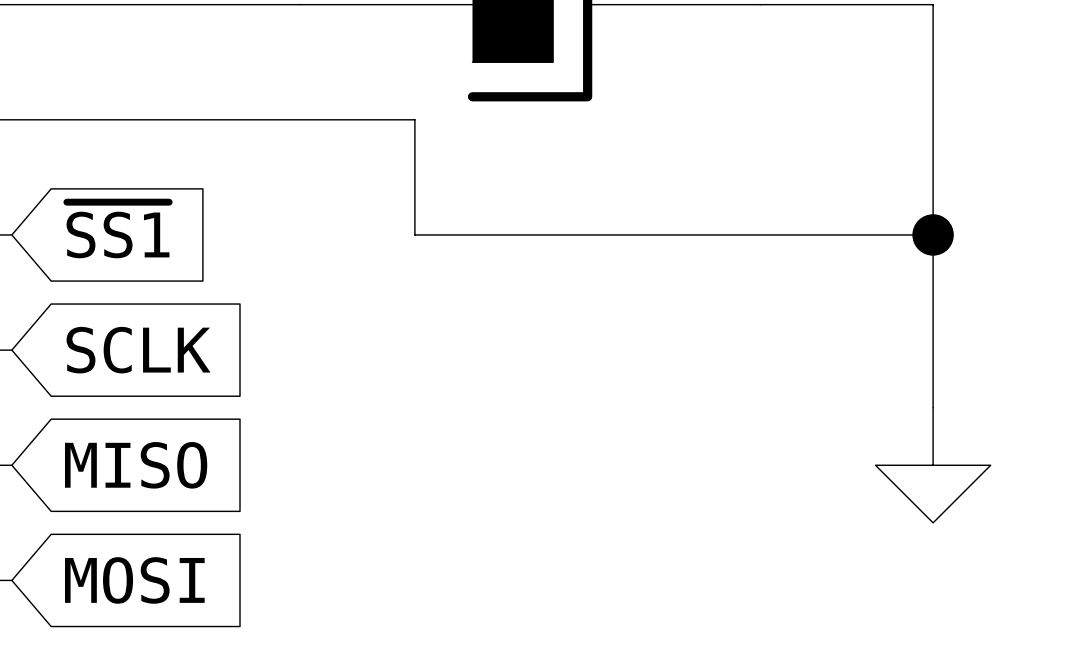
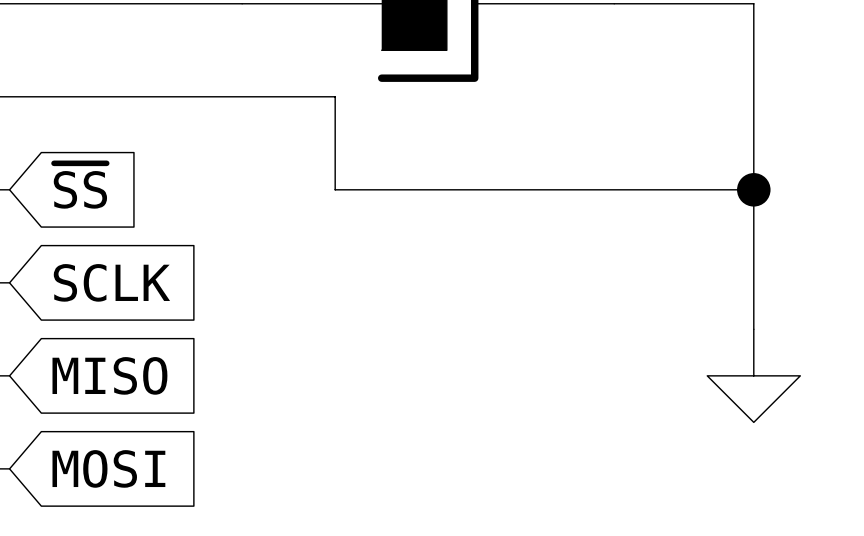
global label: ~{SS1} (118, 230) -> ~{SS} (80, 185)

